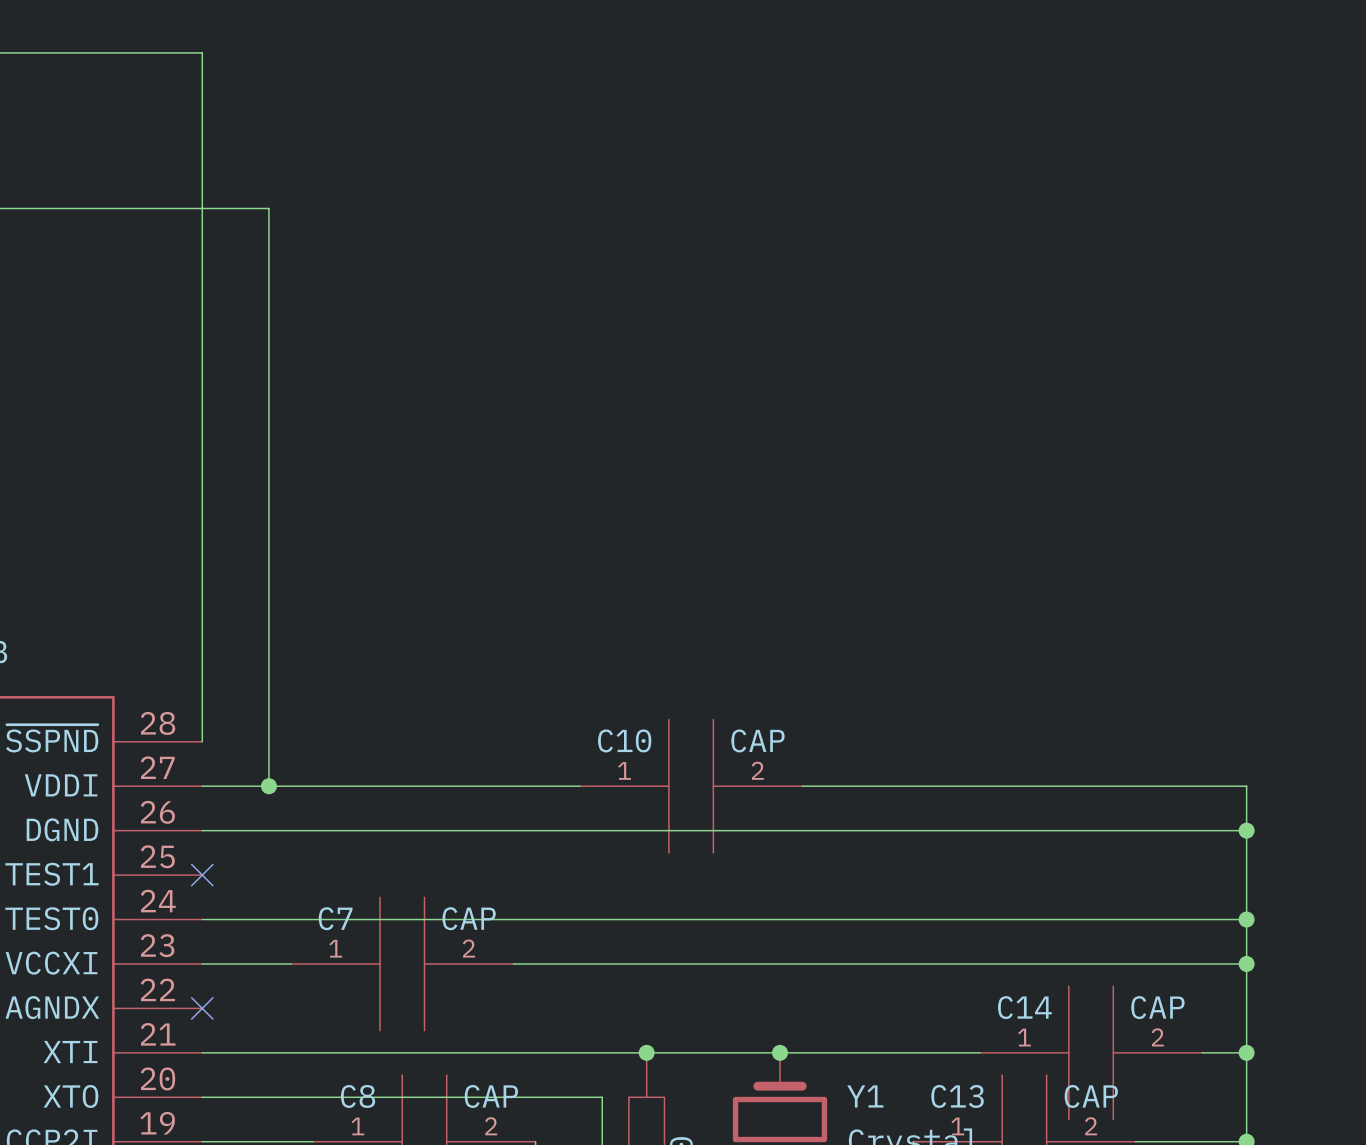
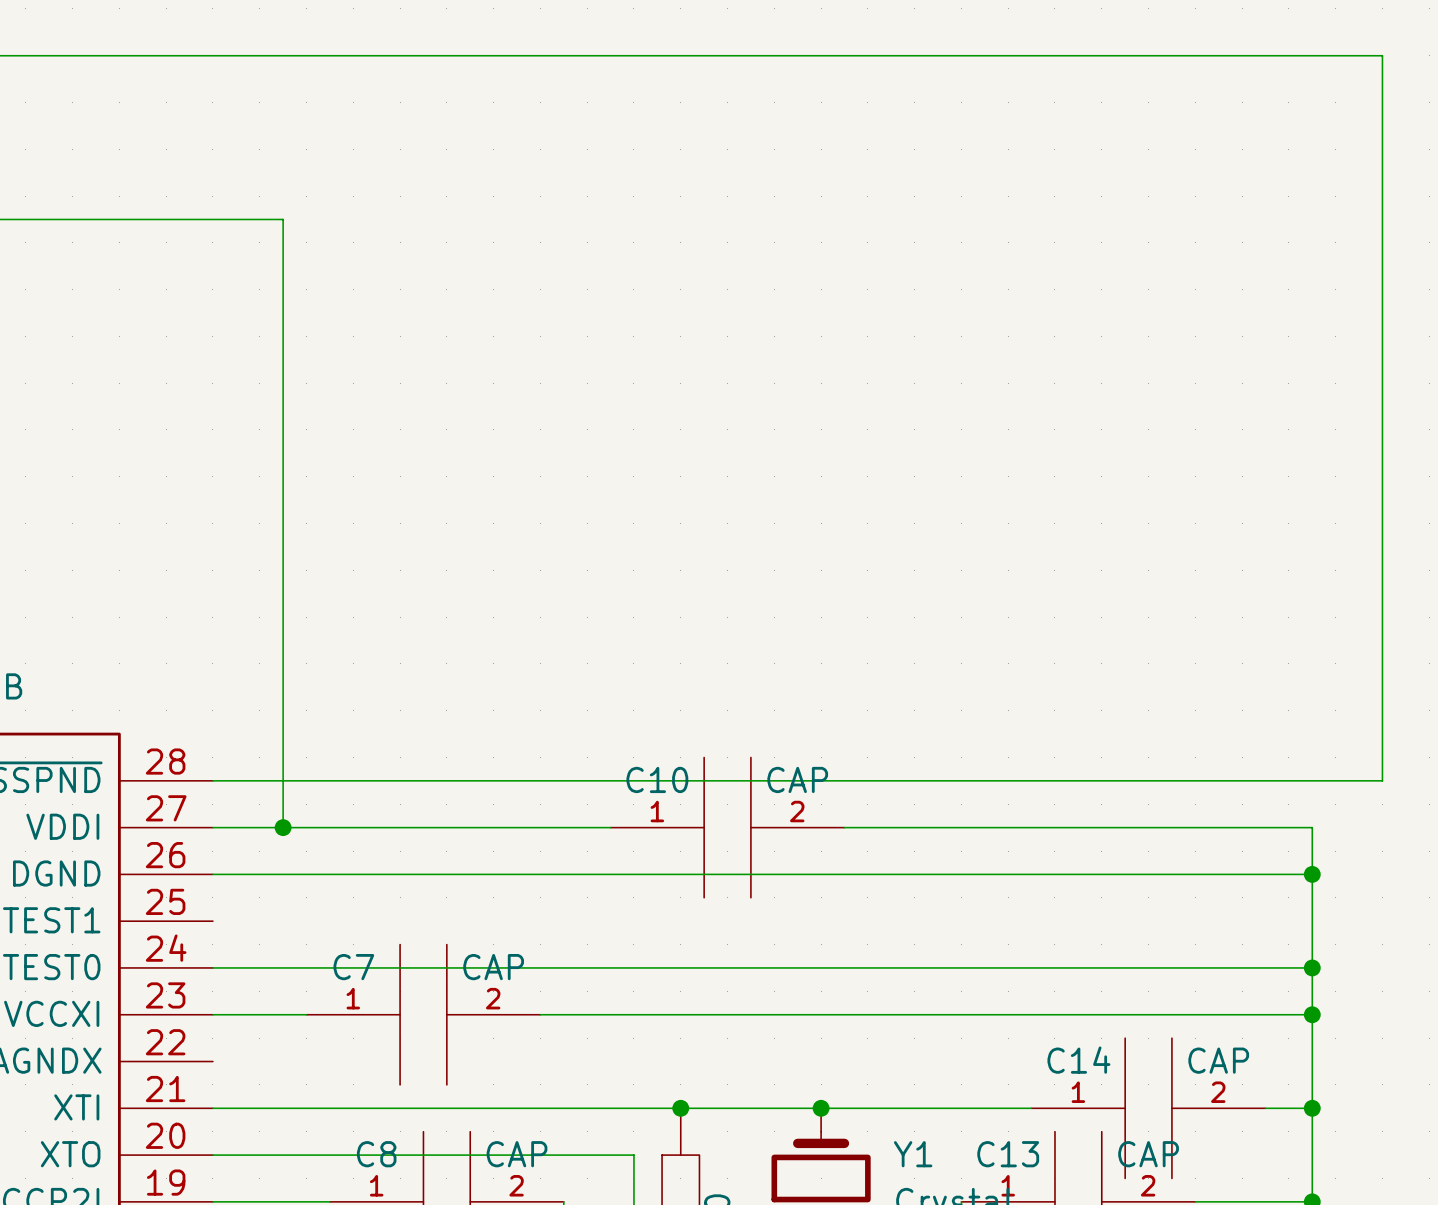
wire: (202, 52) (202, 741) -> (212, 55) (1382, 55) (1382, 780) (212, 780)
no-connect mark: (202, 875) -> none
no-connect mark: (202, 1008) -> none

